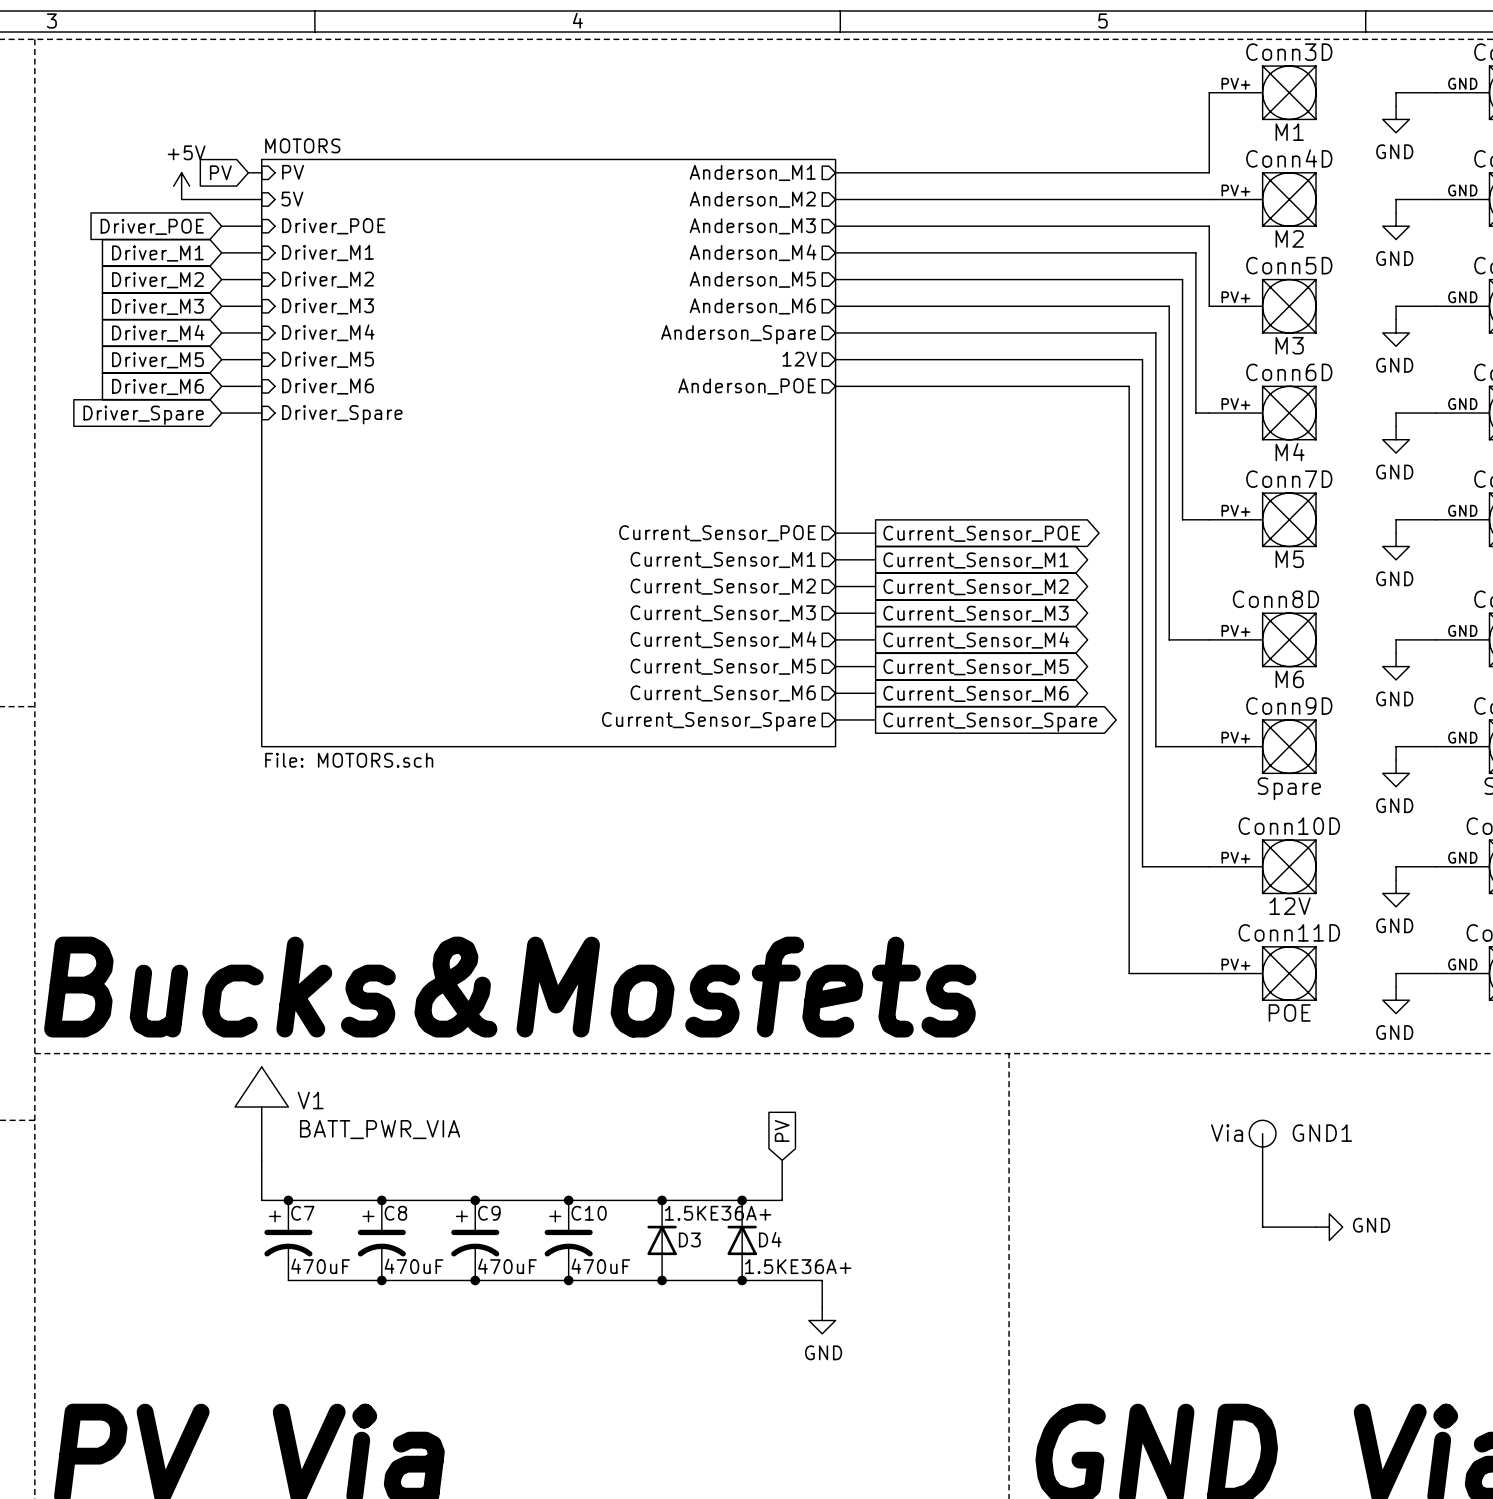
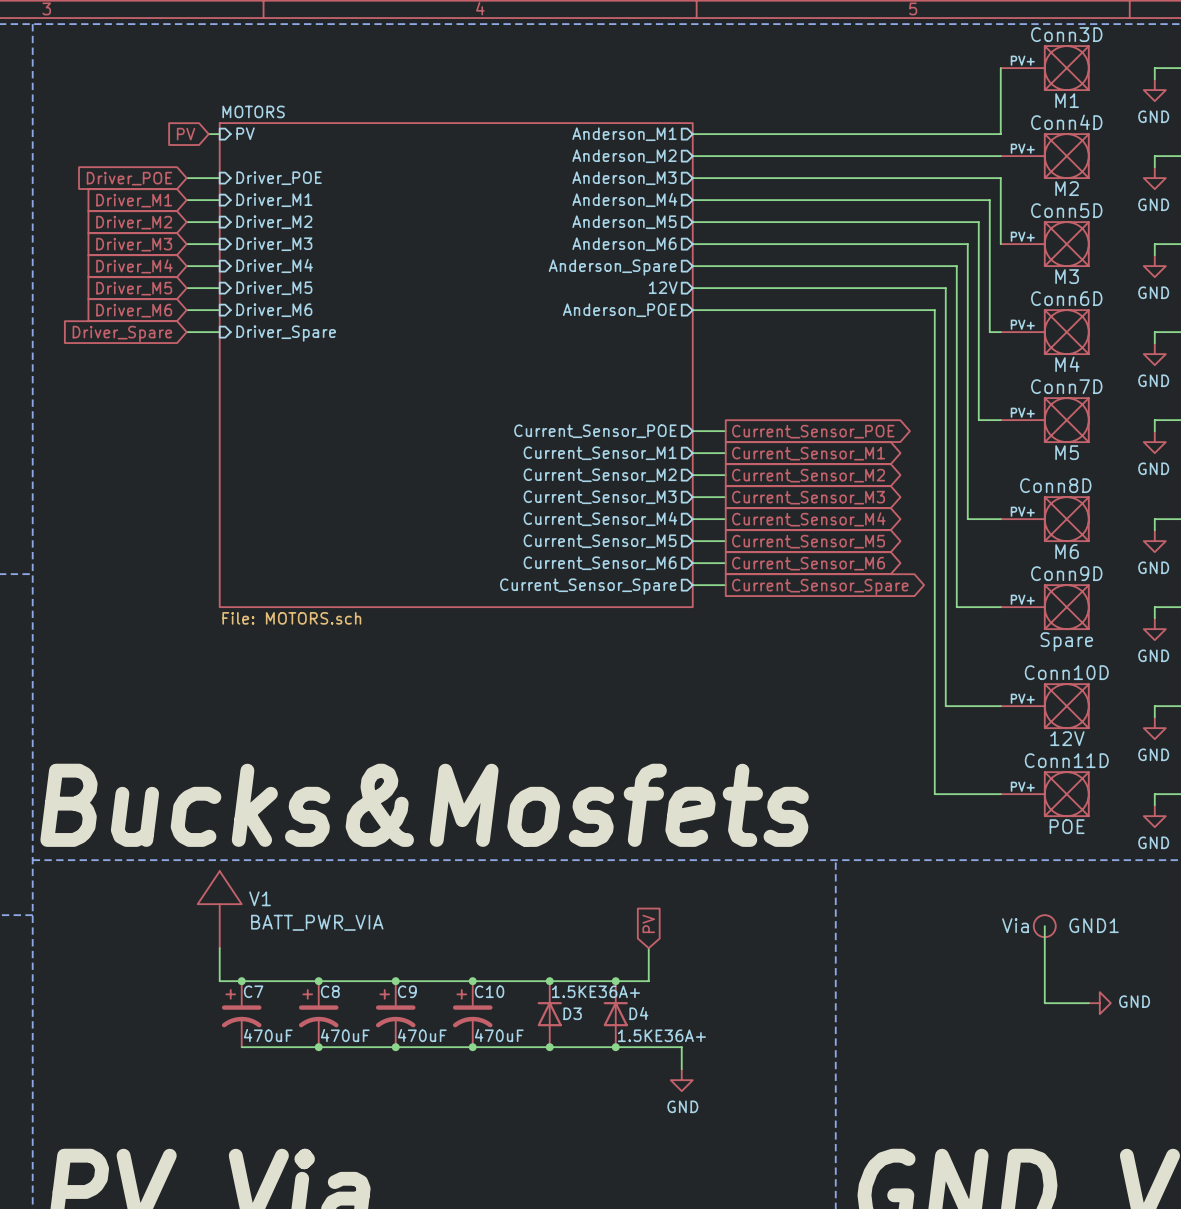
power symbol: +5V (181, 186) -> none
wire: (181, 199) (261, 199) -> none
sheet pin: 5V (292, 199) -> none

